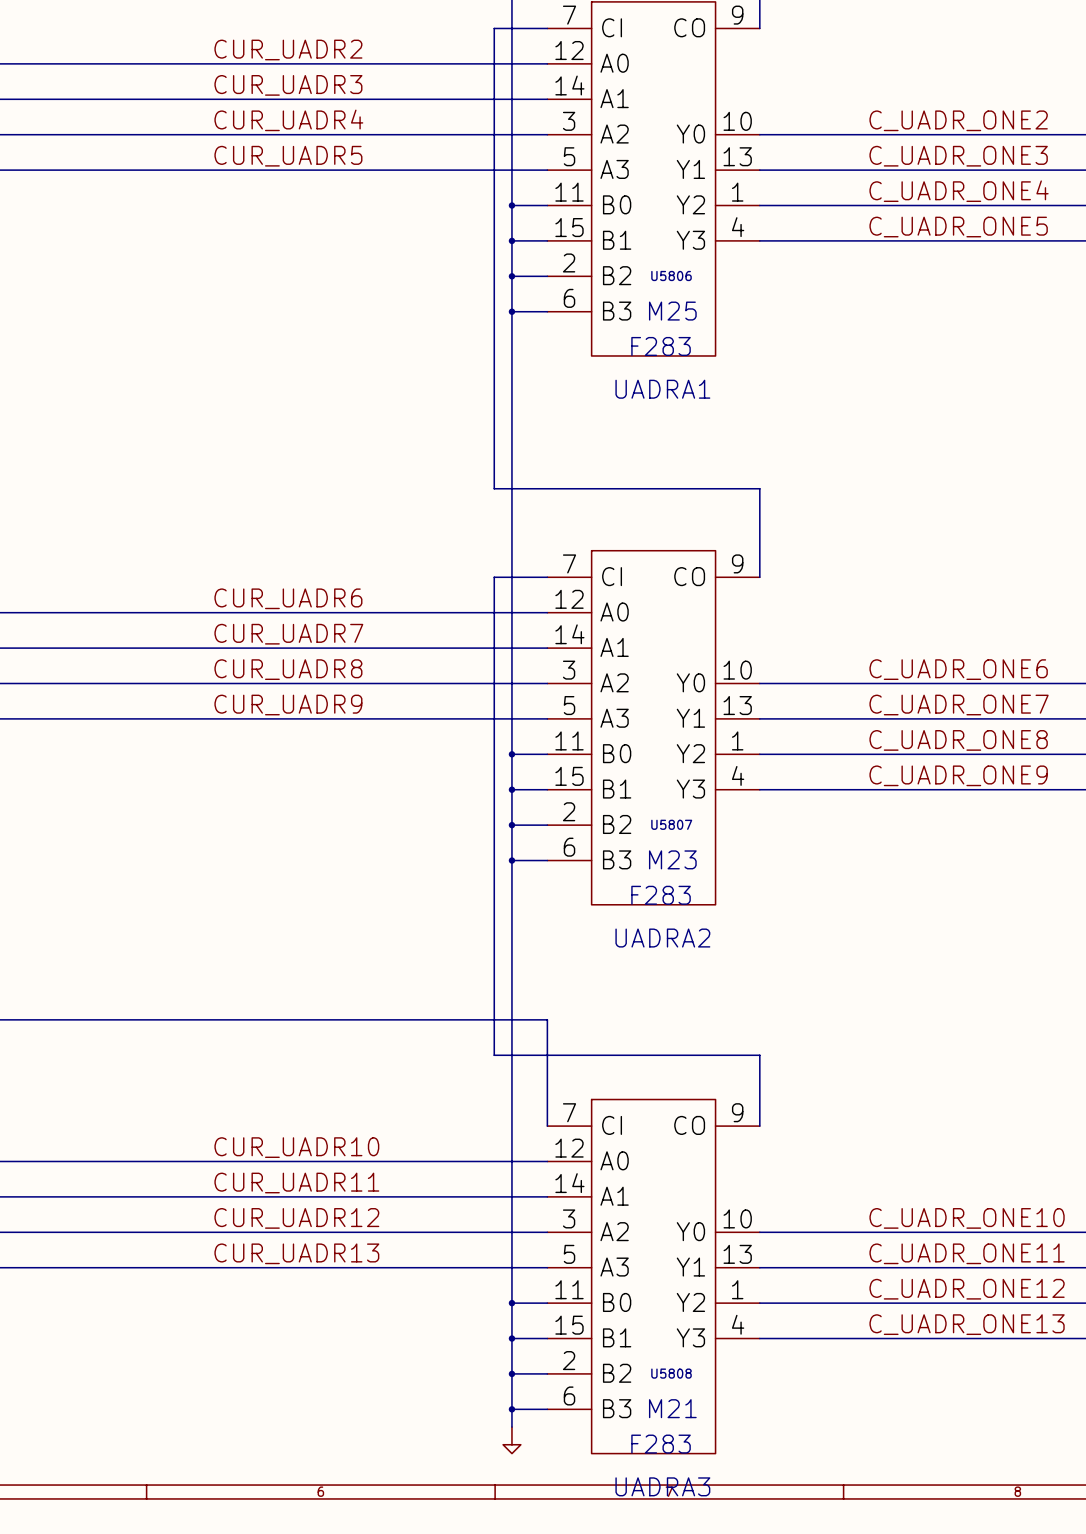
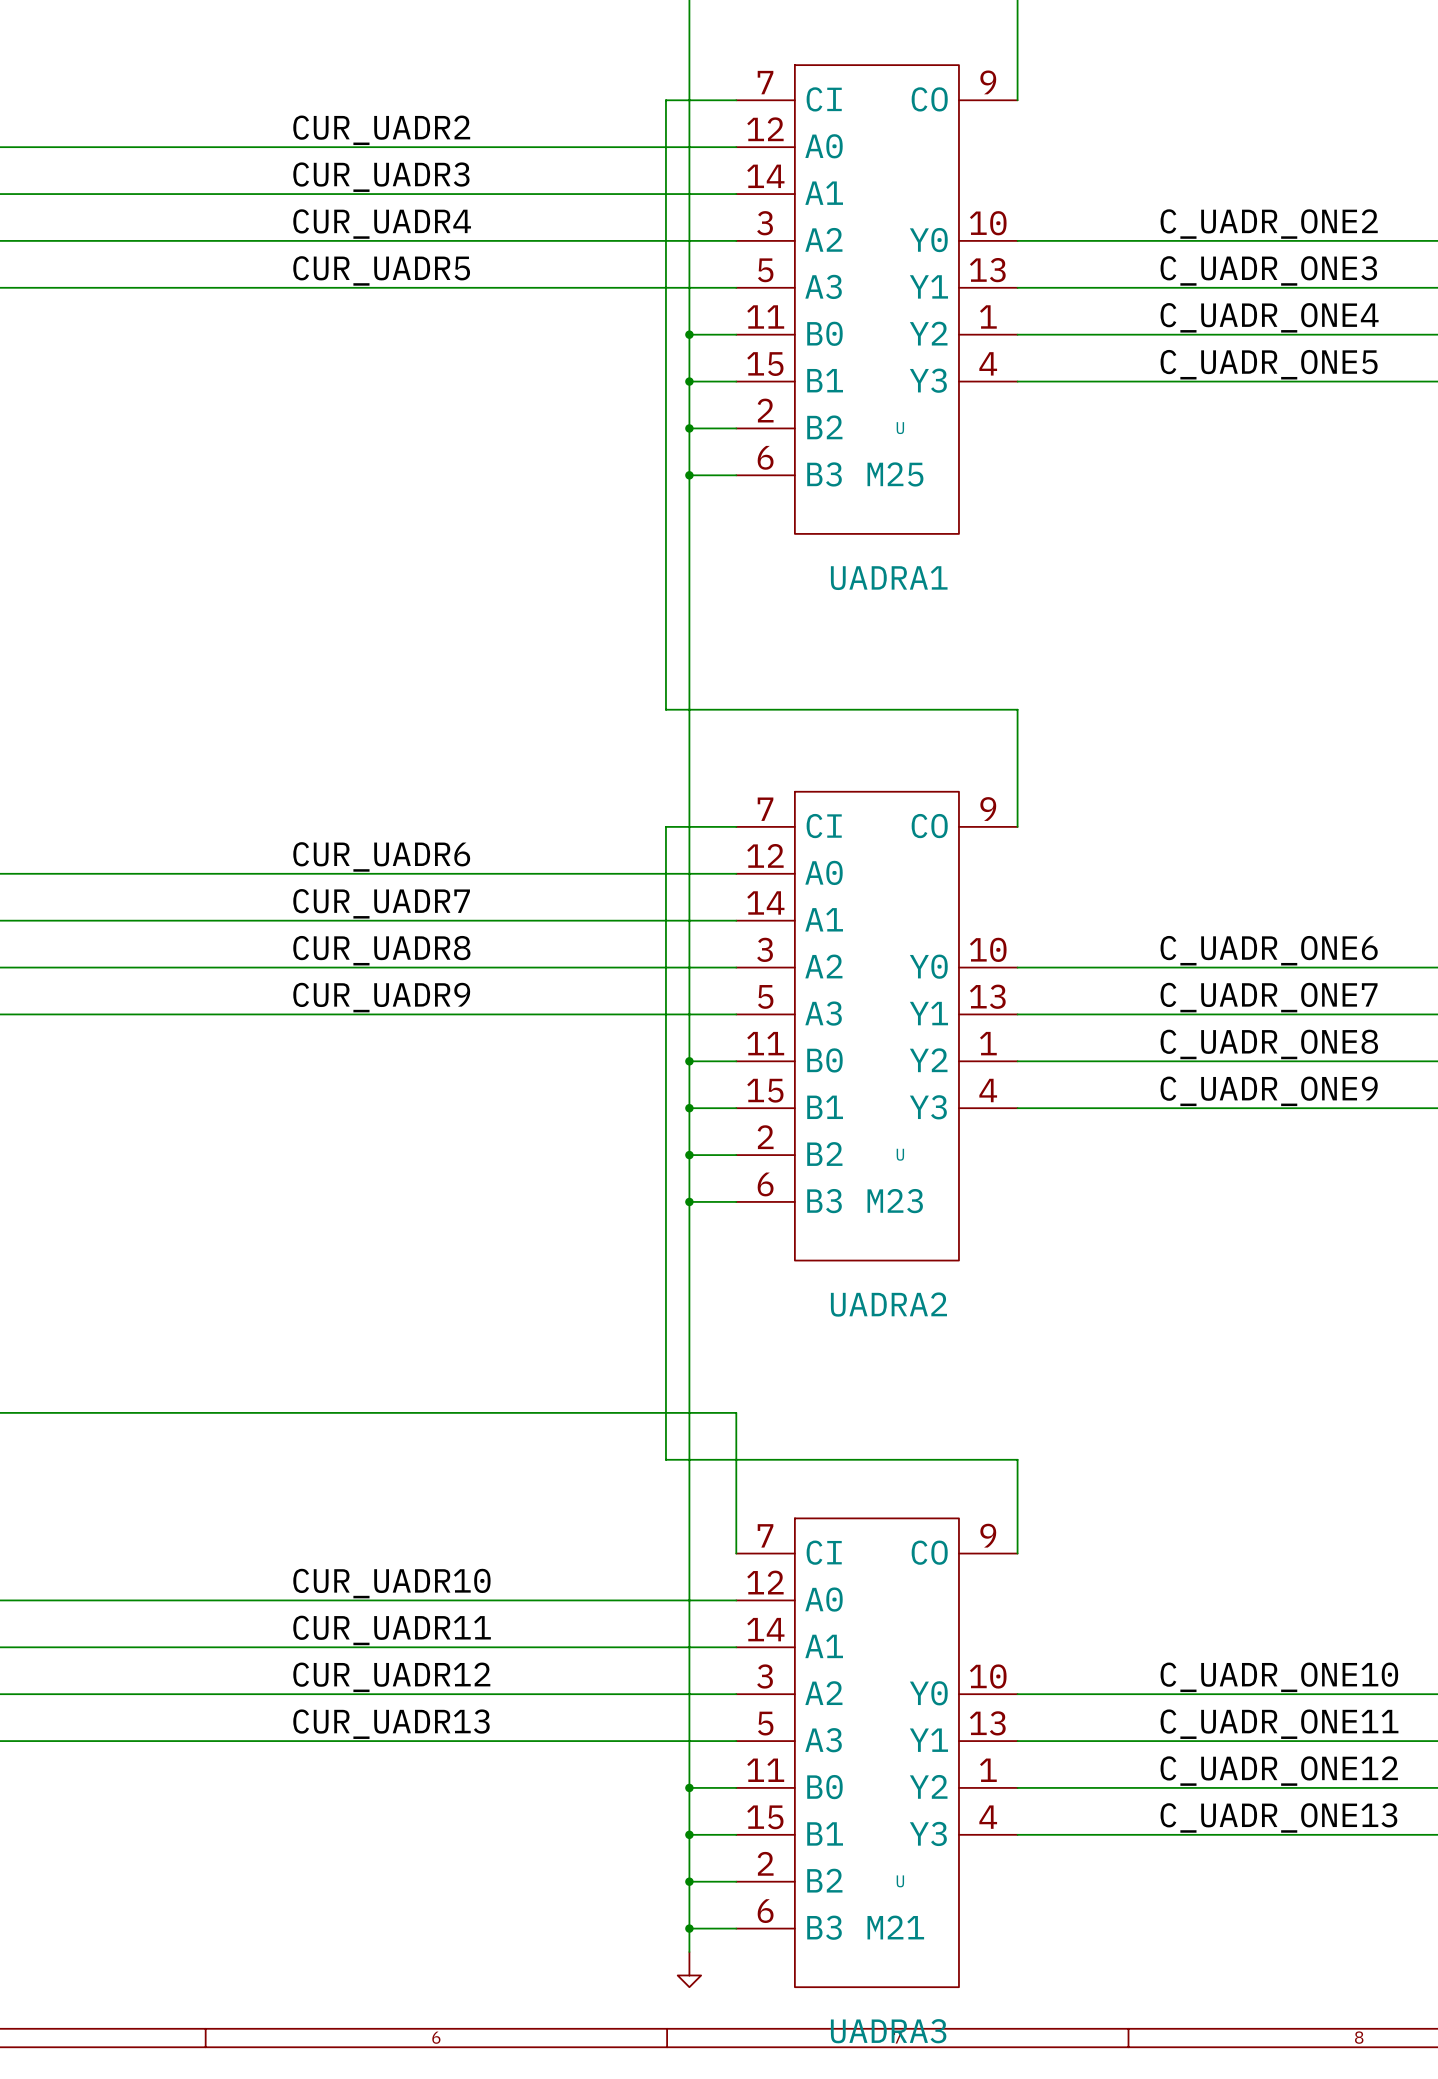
U5806 name: U5806 (671, 275) -> U (900, 428)
U5806 value: F283 (661, 346) -> none
U5807 name: U5807 (671, 824) -> U (900, 1154)
U5807 value: F283 (661, 895) -> none
U5808 name: U5808 (671, 1373) -> U (900, 1881)
U5808 value: F283 (661, 1444) -> none

